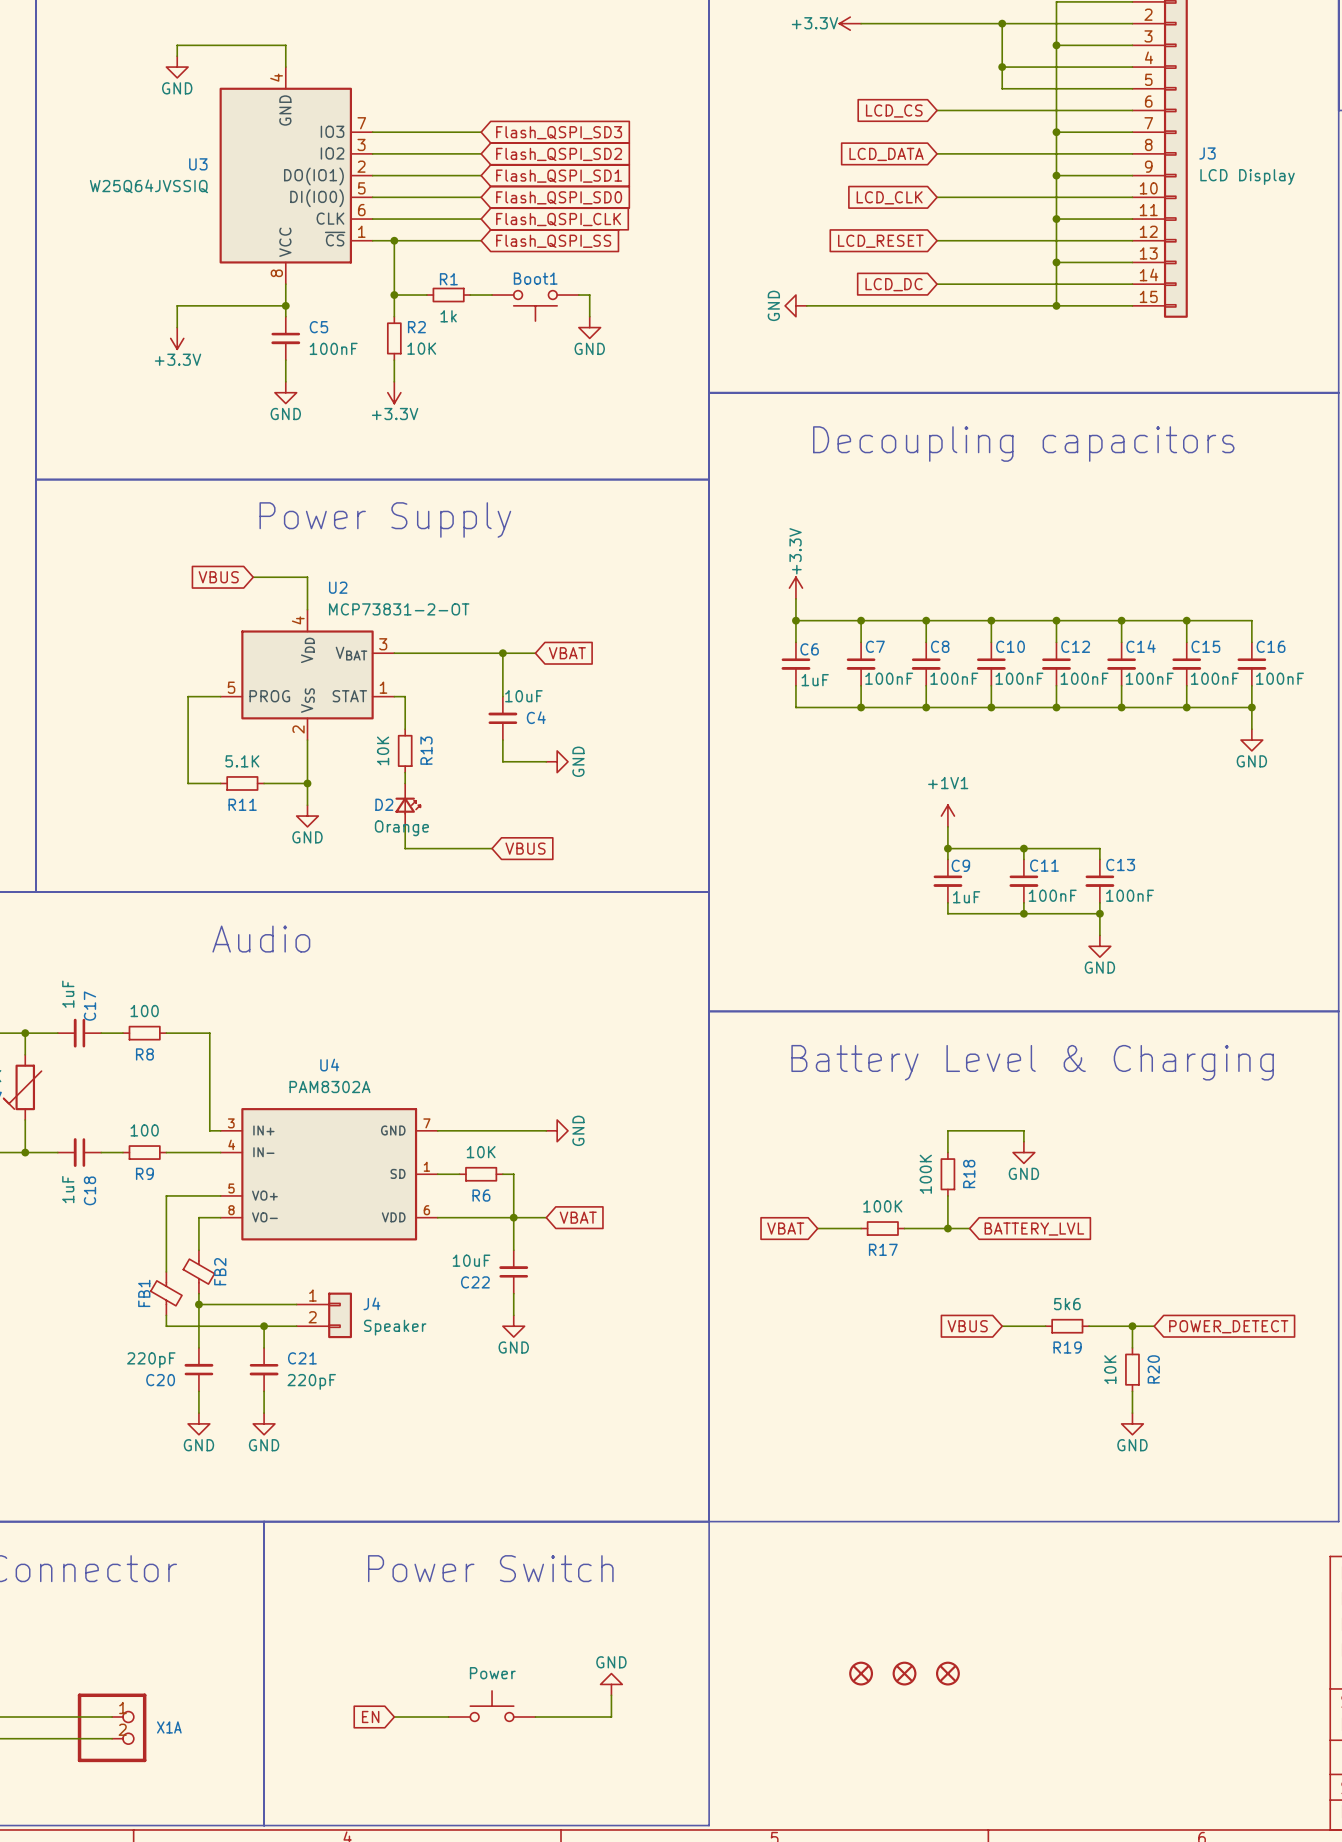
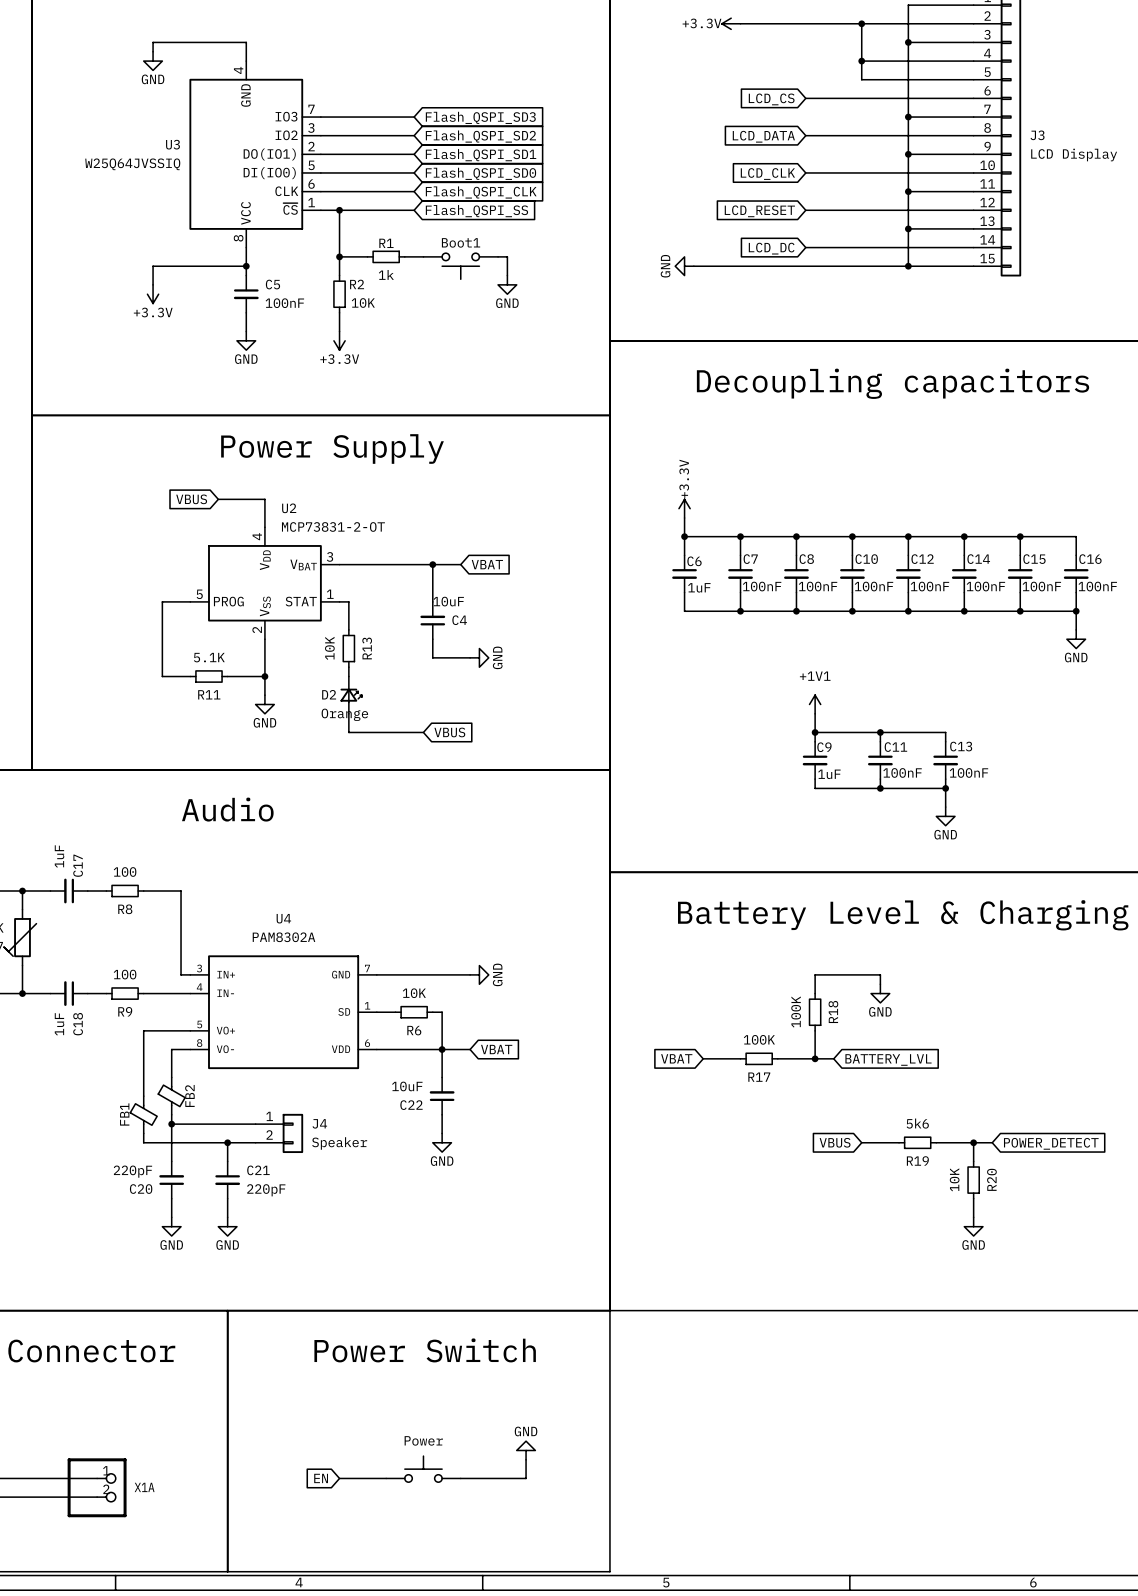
part: (861, 1673) -> none
part: (904, 1673) -> none
part: (947, 1673) -> none

